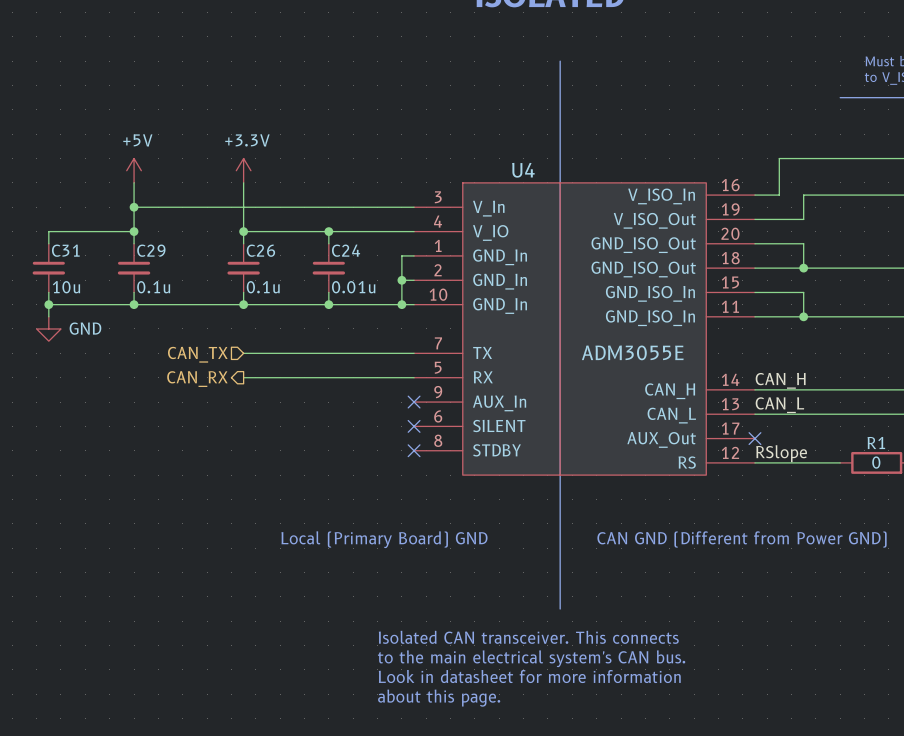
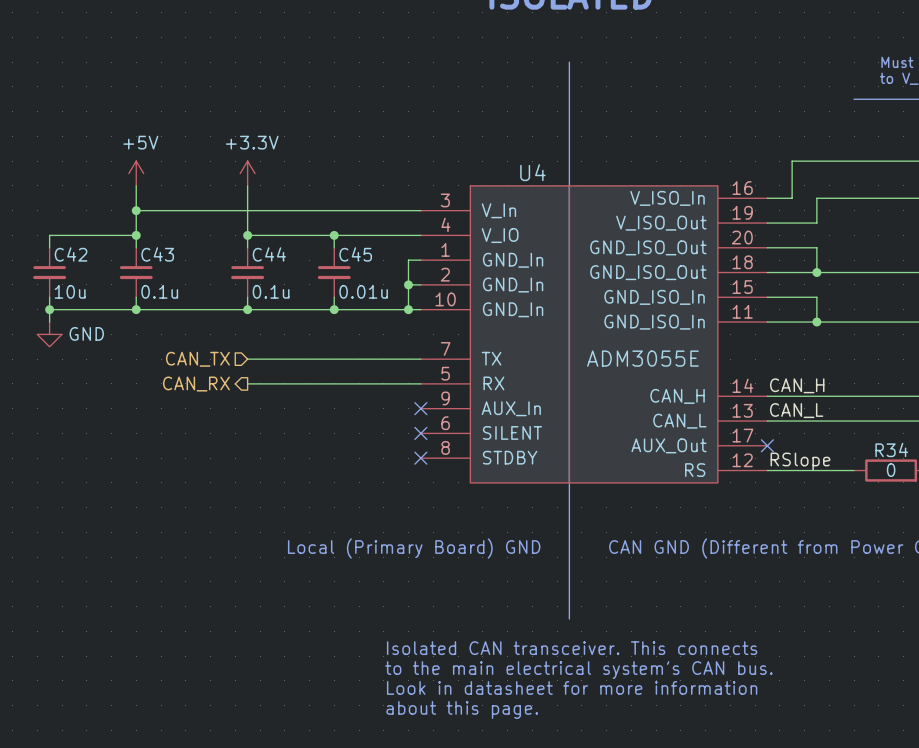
C31 name: C31 (65, 250) -> C42 (71, 254)
C29 name: C29 (151, 250) -> C43 (157, 254)
C26 name: C26 (260, 250) -> C44 (269, 254)
C24 name: C24 (346, 250) -> C45 (355, 254)
R1 name: R1 (876, 442) -> R34 (891, 449)

